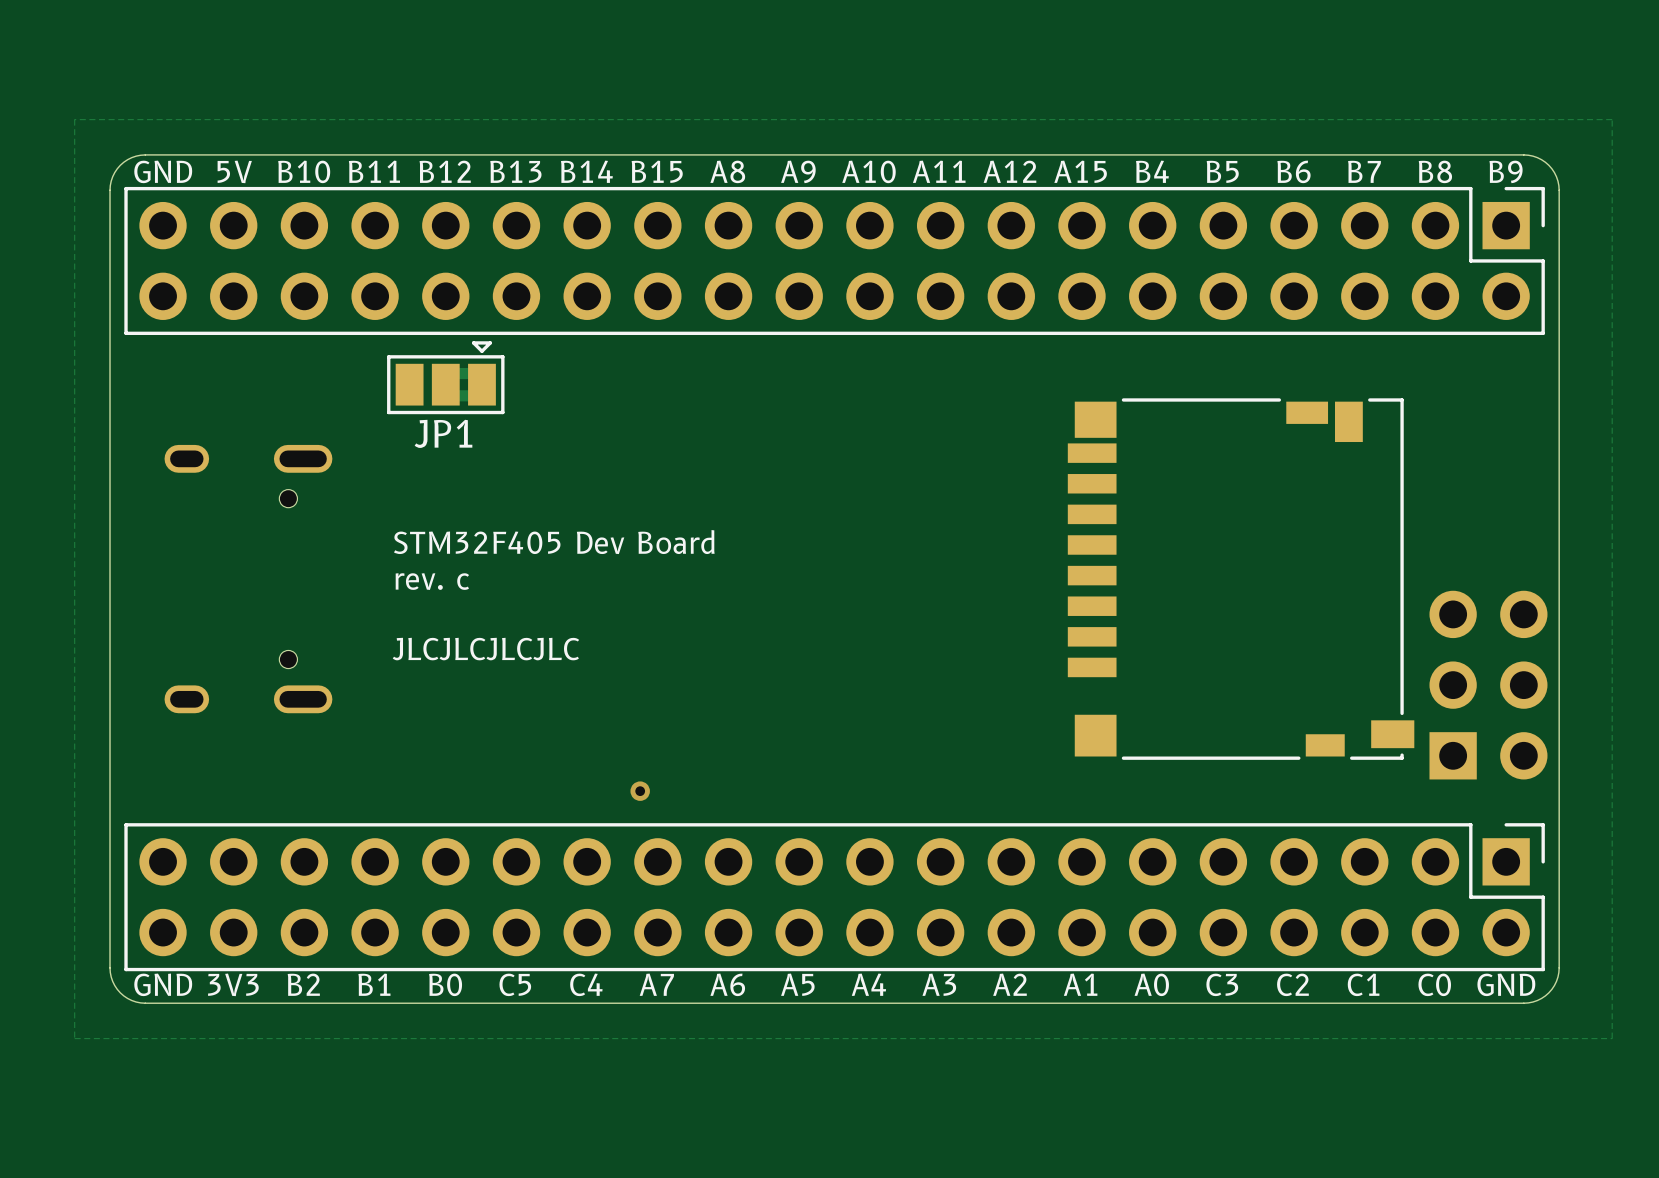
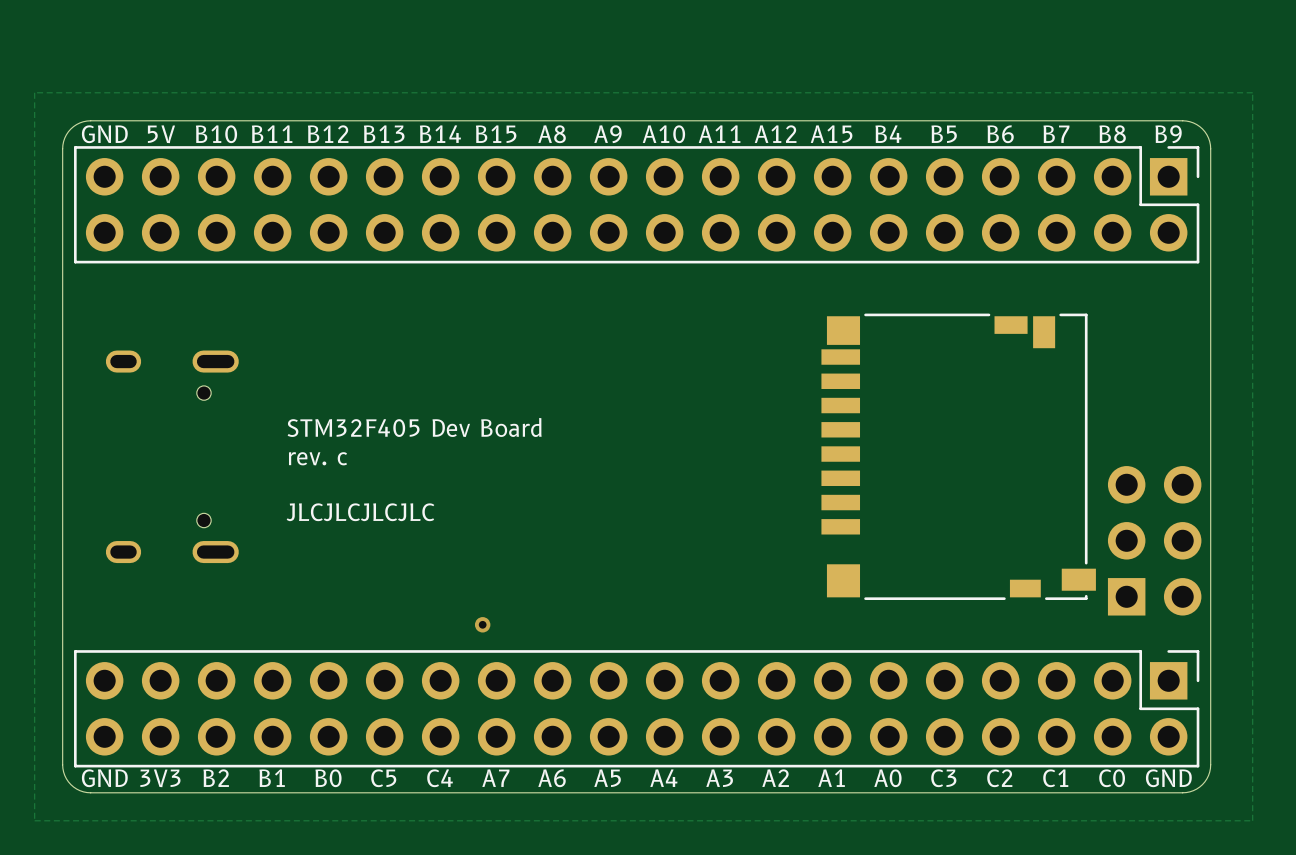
JP1: (445, 377) -> none

